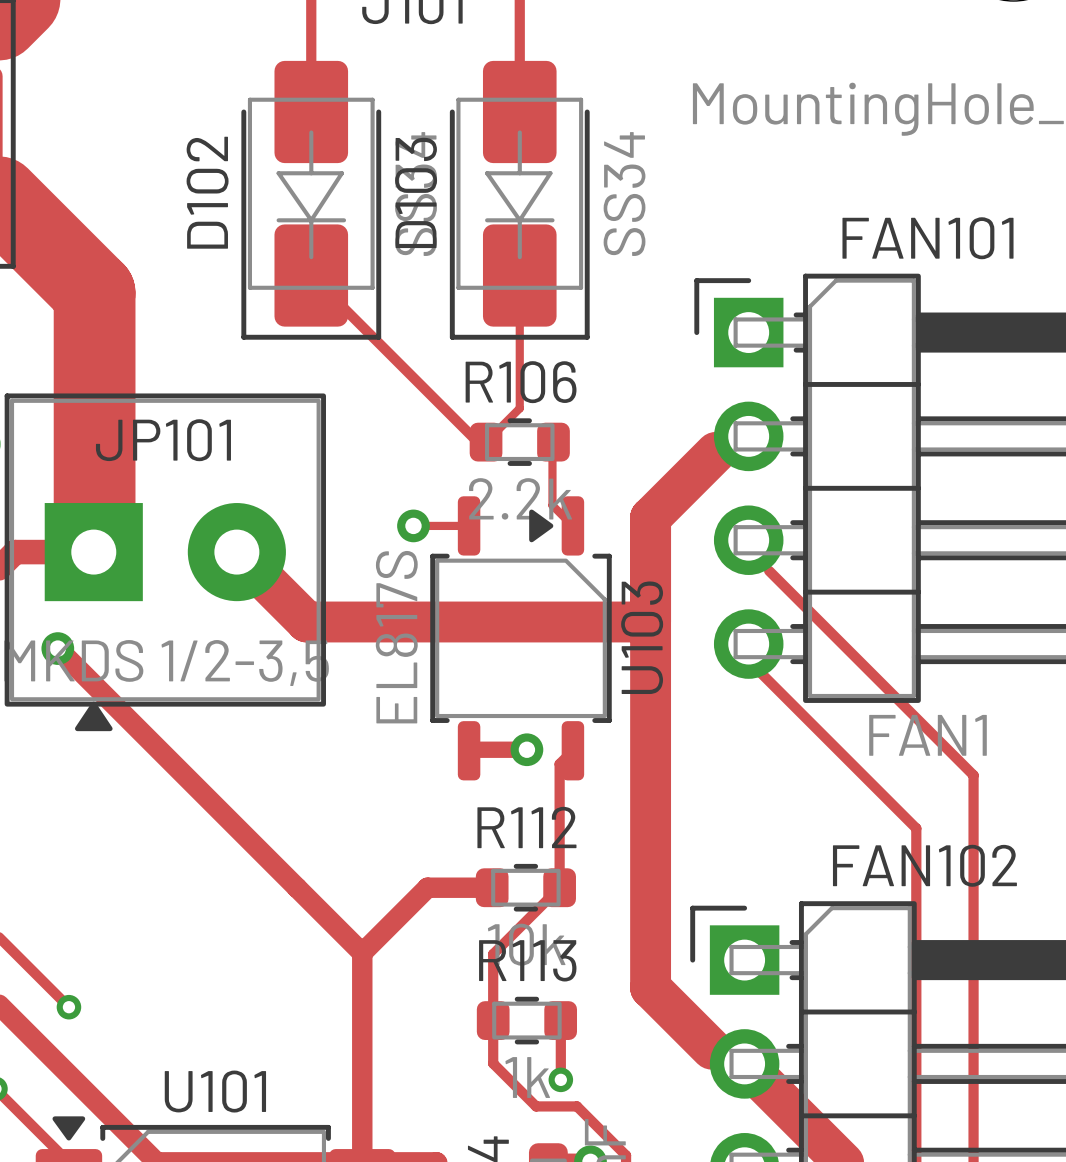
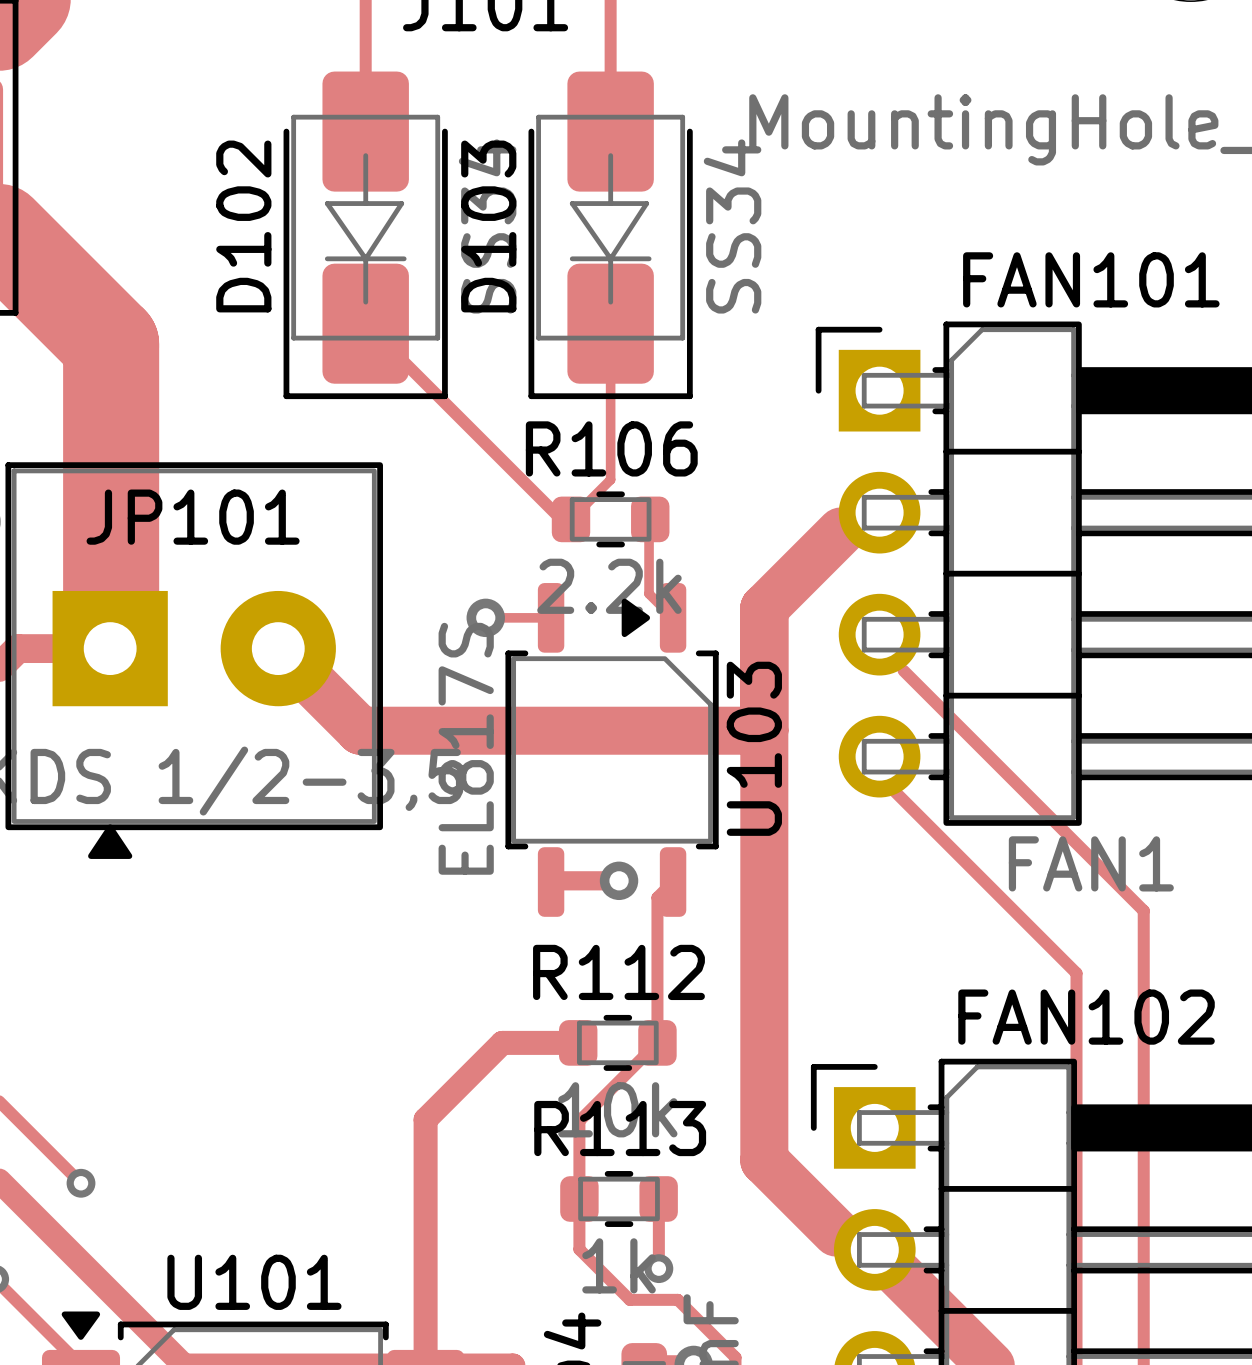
track: (57, 648) (362, 953) -> none
via: (57, 648) -> none

